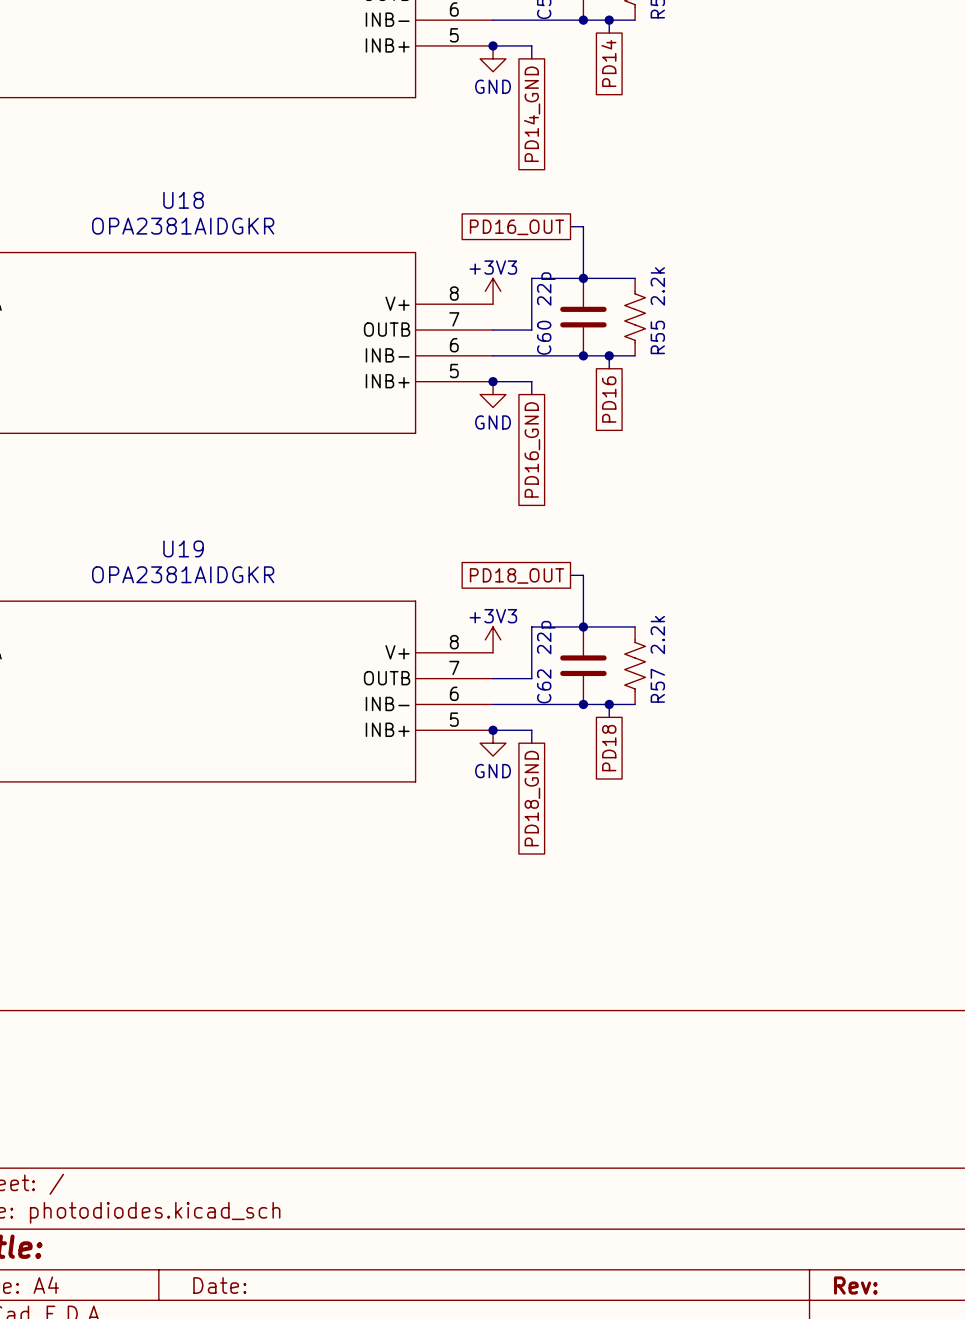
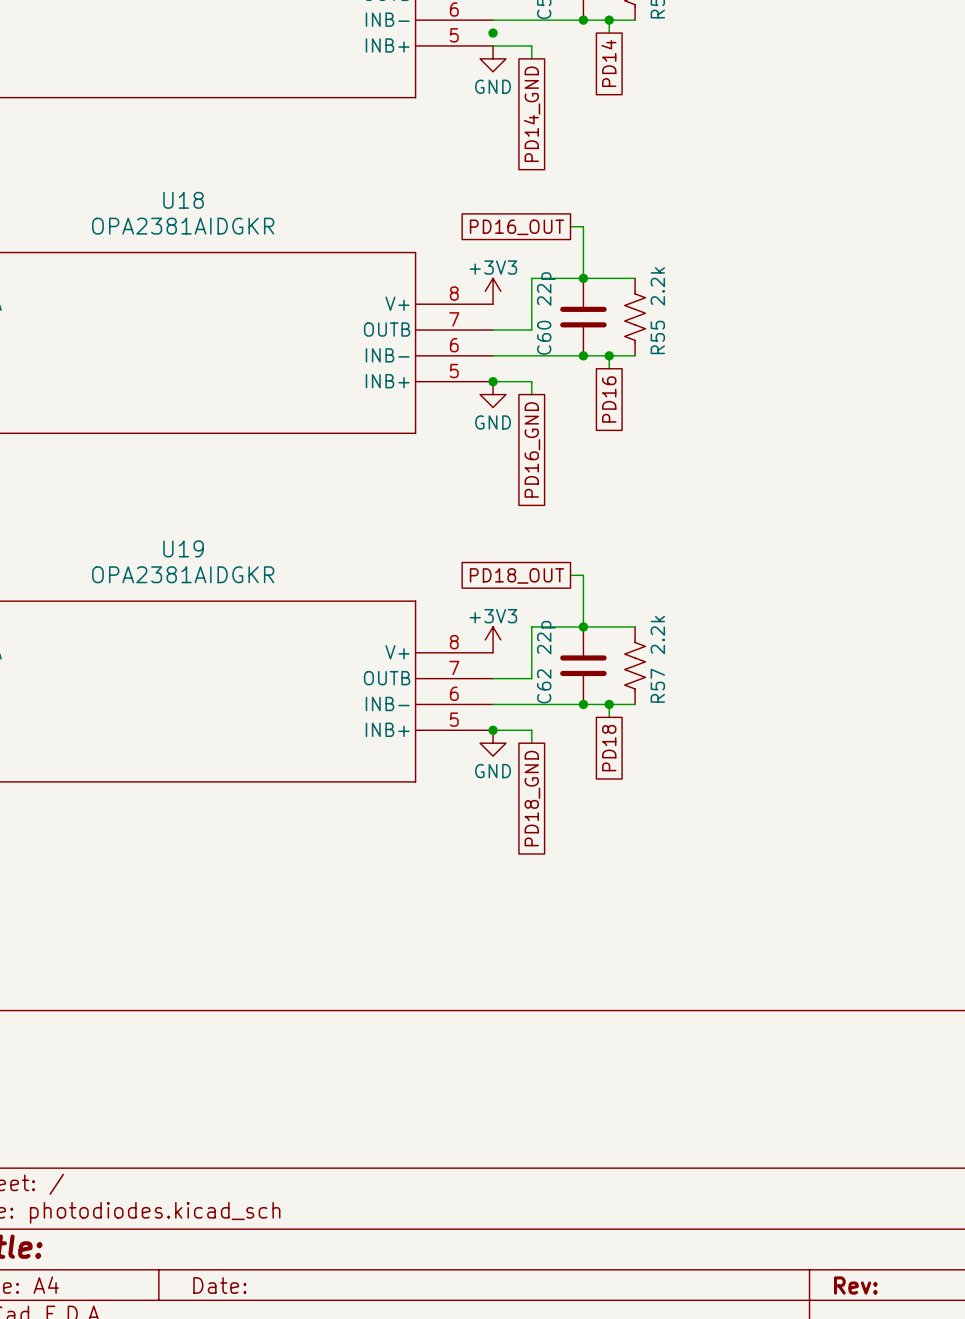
junction position: (493, 45) -> (493, 33)

